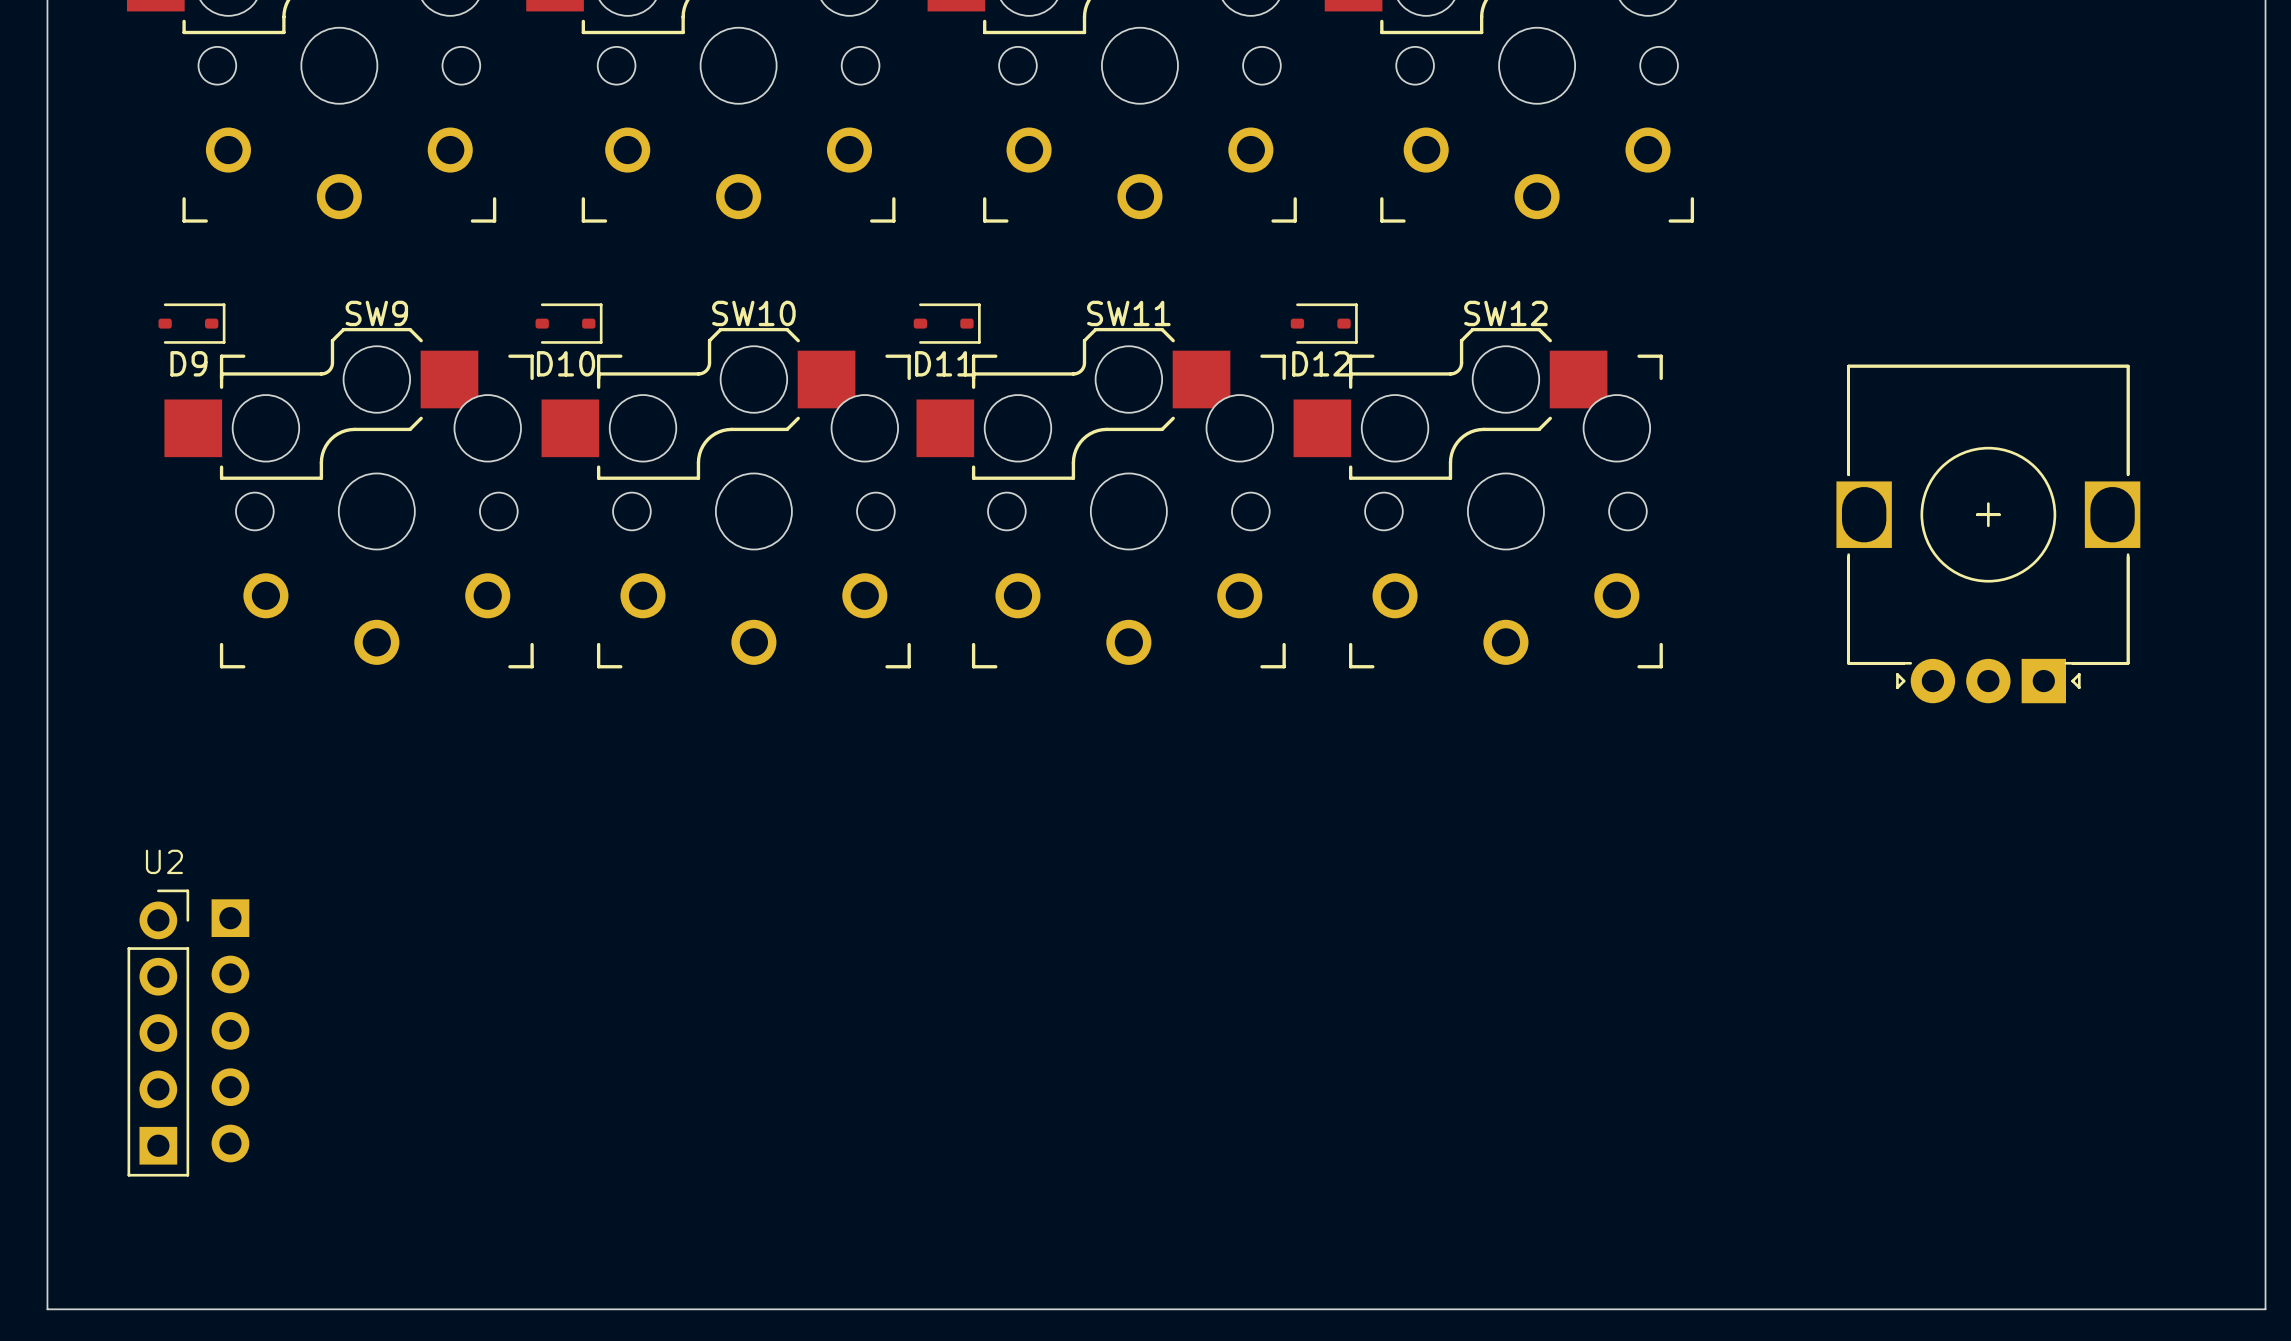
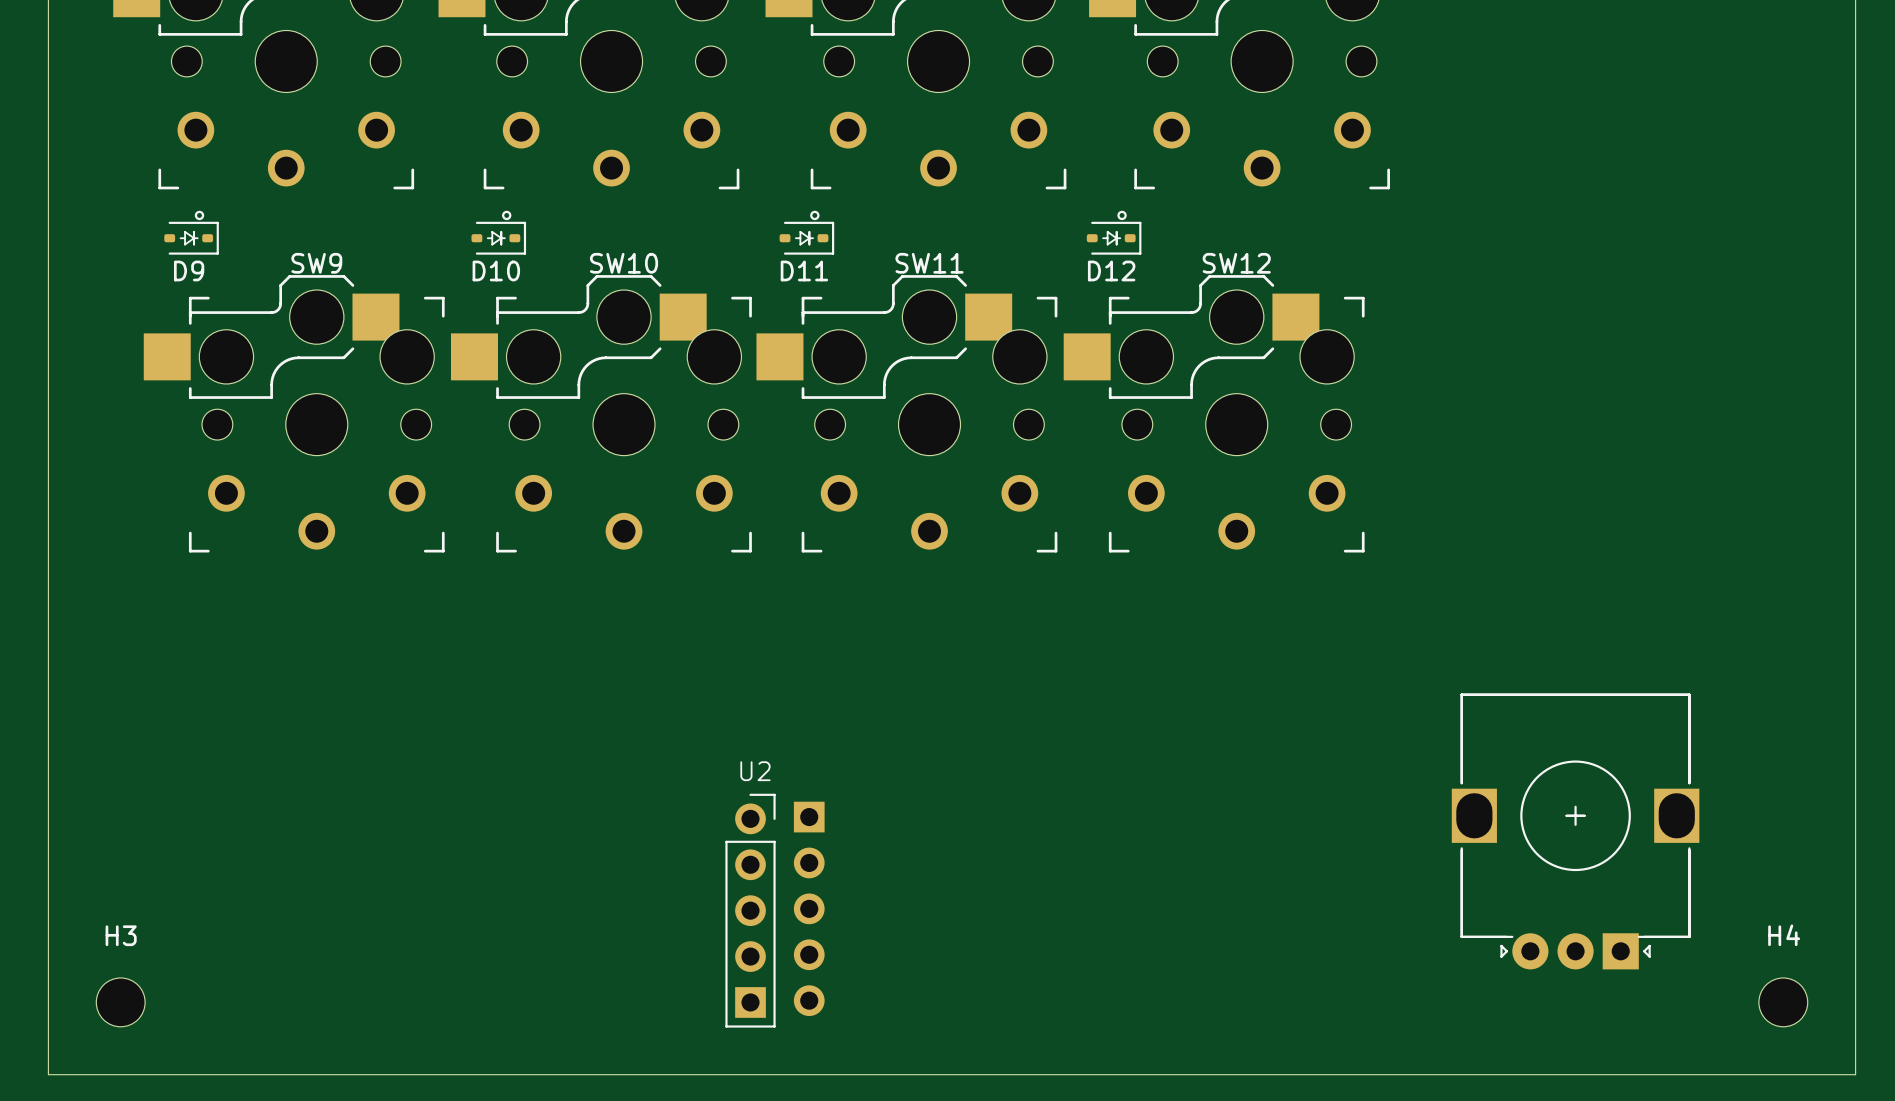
D9 footprint: [158, 303, 226, 344] -> [164, 210, 219, 255]
D10 footprint: [535, 303, 603, 344] -> [471, 210, 527, 255]
D11 footprint: [913, 303, 981, 344] -> [779, 210, 835, 255]
D12 footprint: [1290, 303, 1358, 344] -> [1086, 210, 1142, 255]
part position: (1988, 533) -> (1575, 831)
part: (230, 1030) -> none
U2 position: (158, 1033) -> (750, 910)
part: none -> (809, 908)
H3: none -> (120, 1002)
H4: none -> (1783, 1002)

